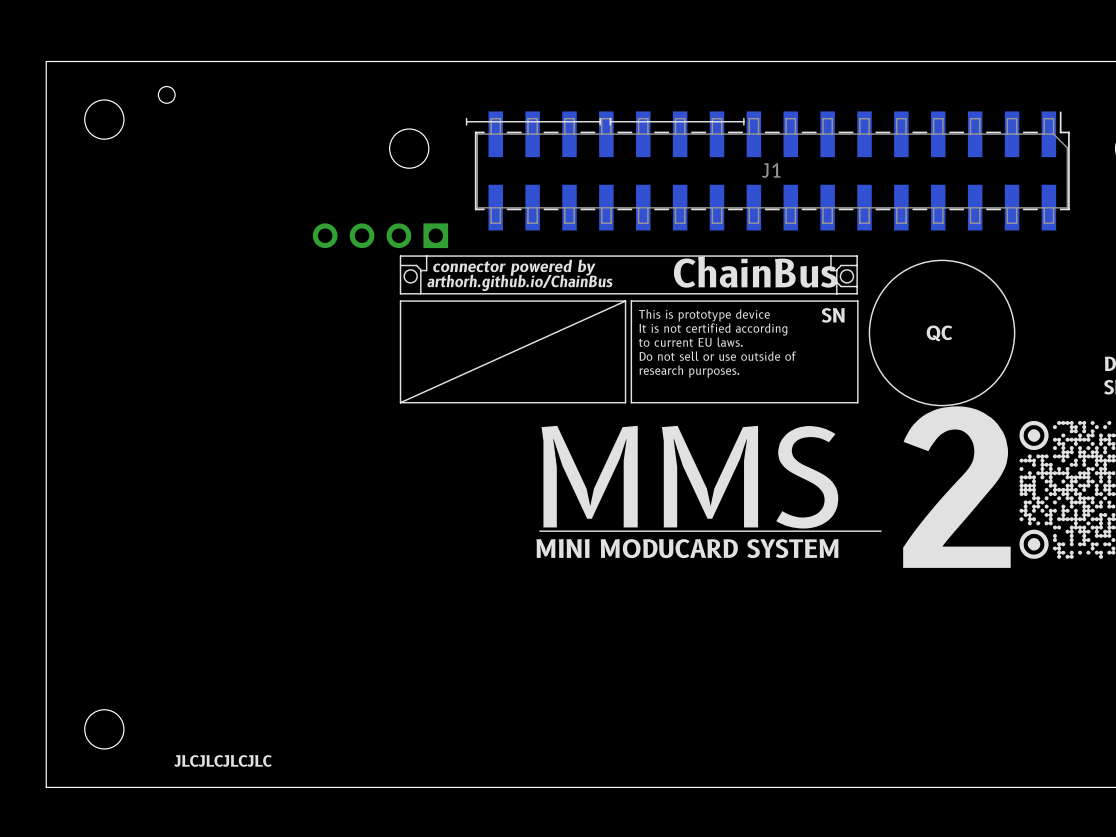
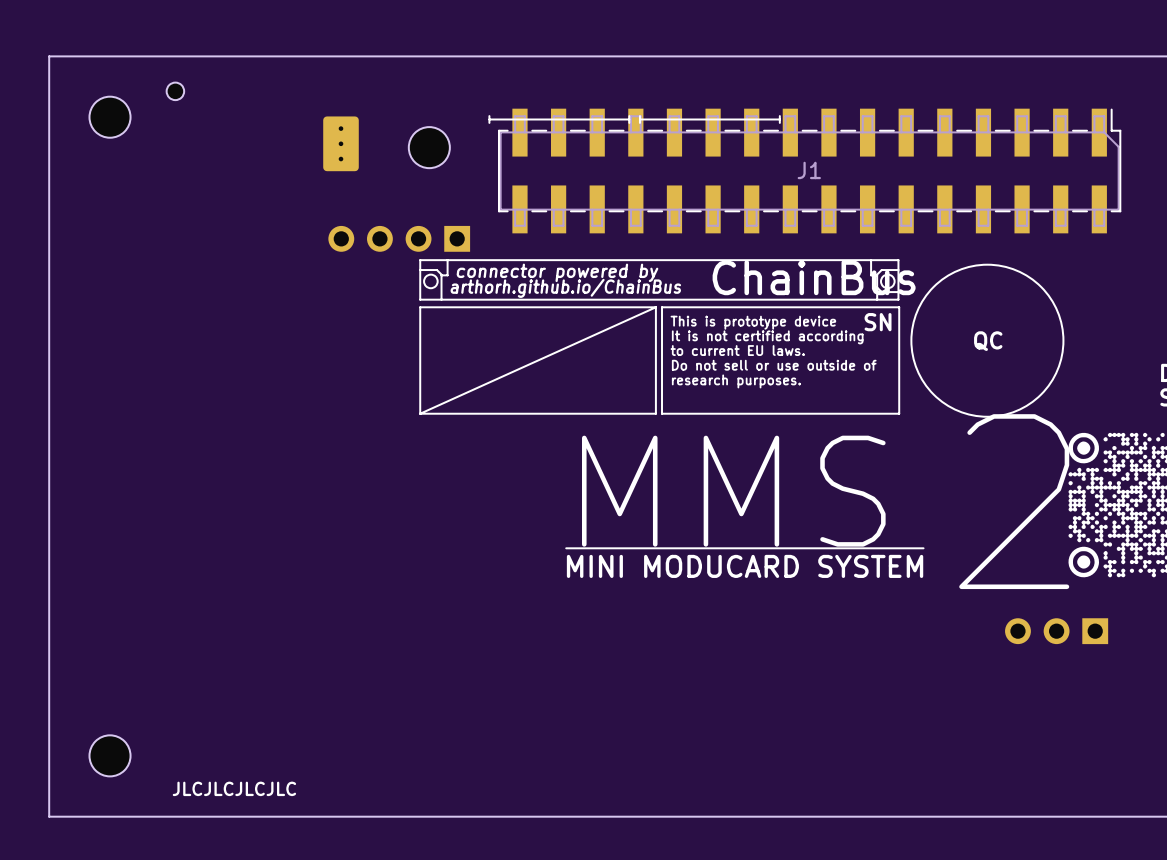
part: none -> (341, 143)
part: none -> (1056, 631)

